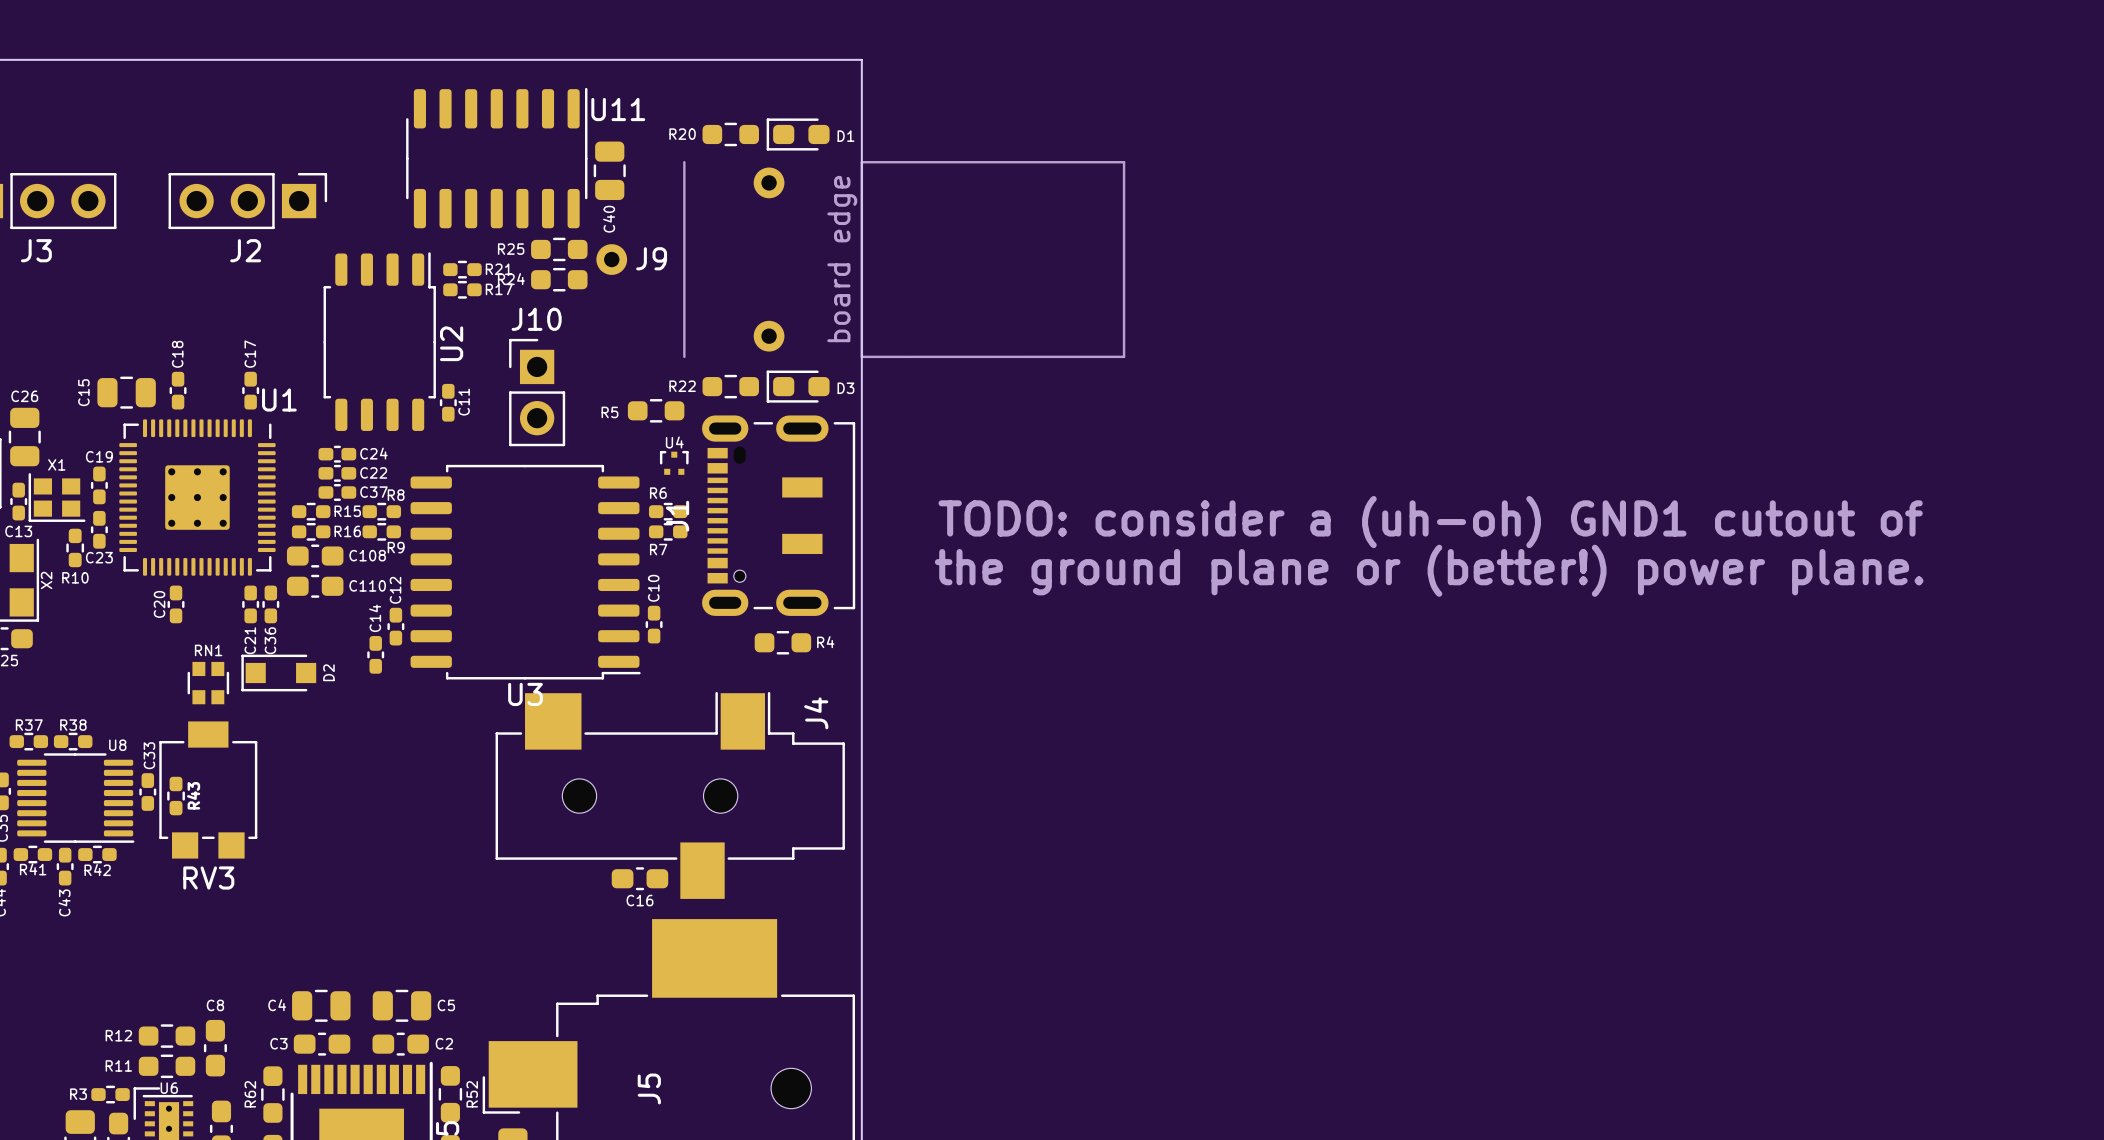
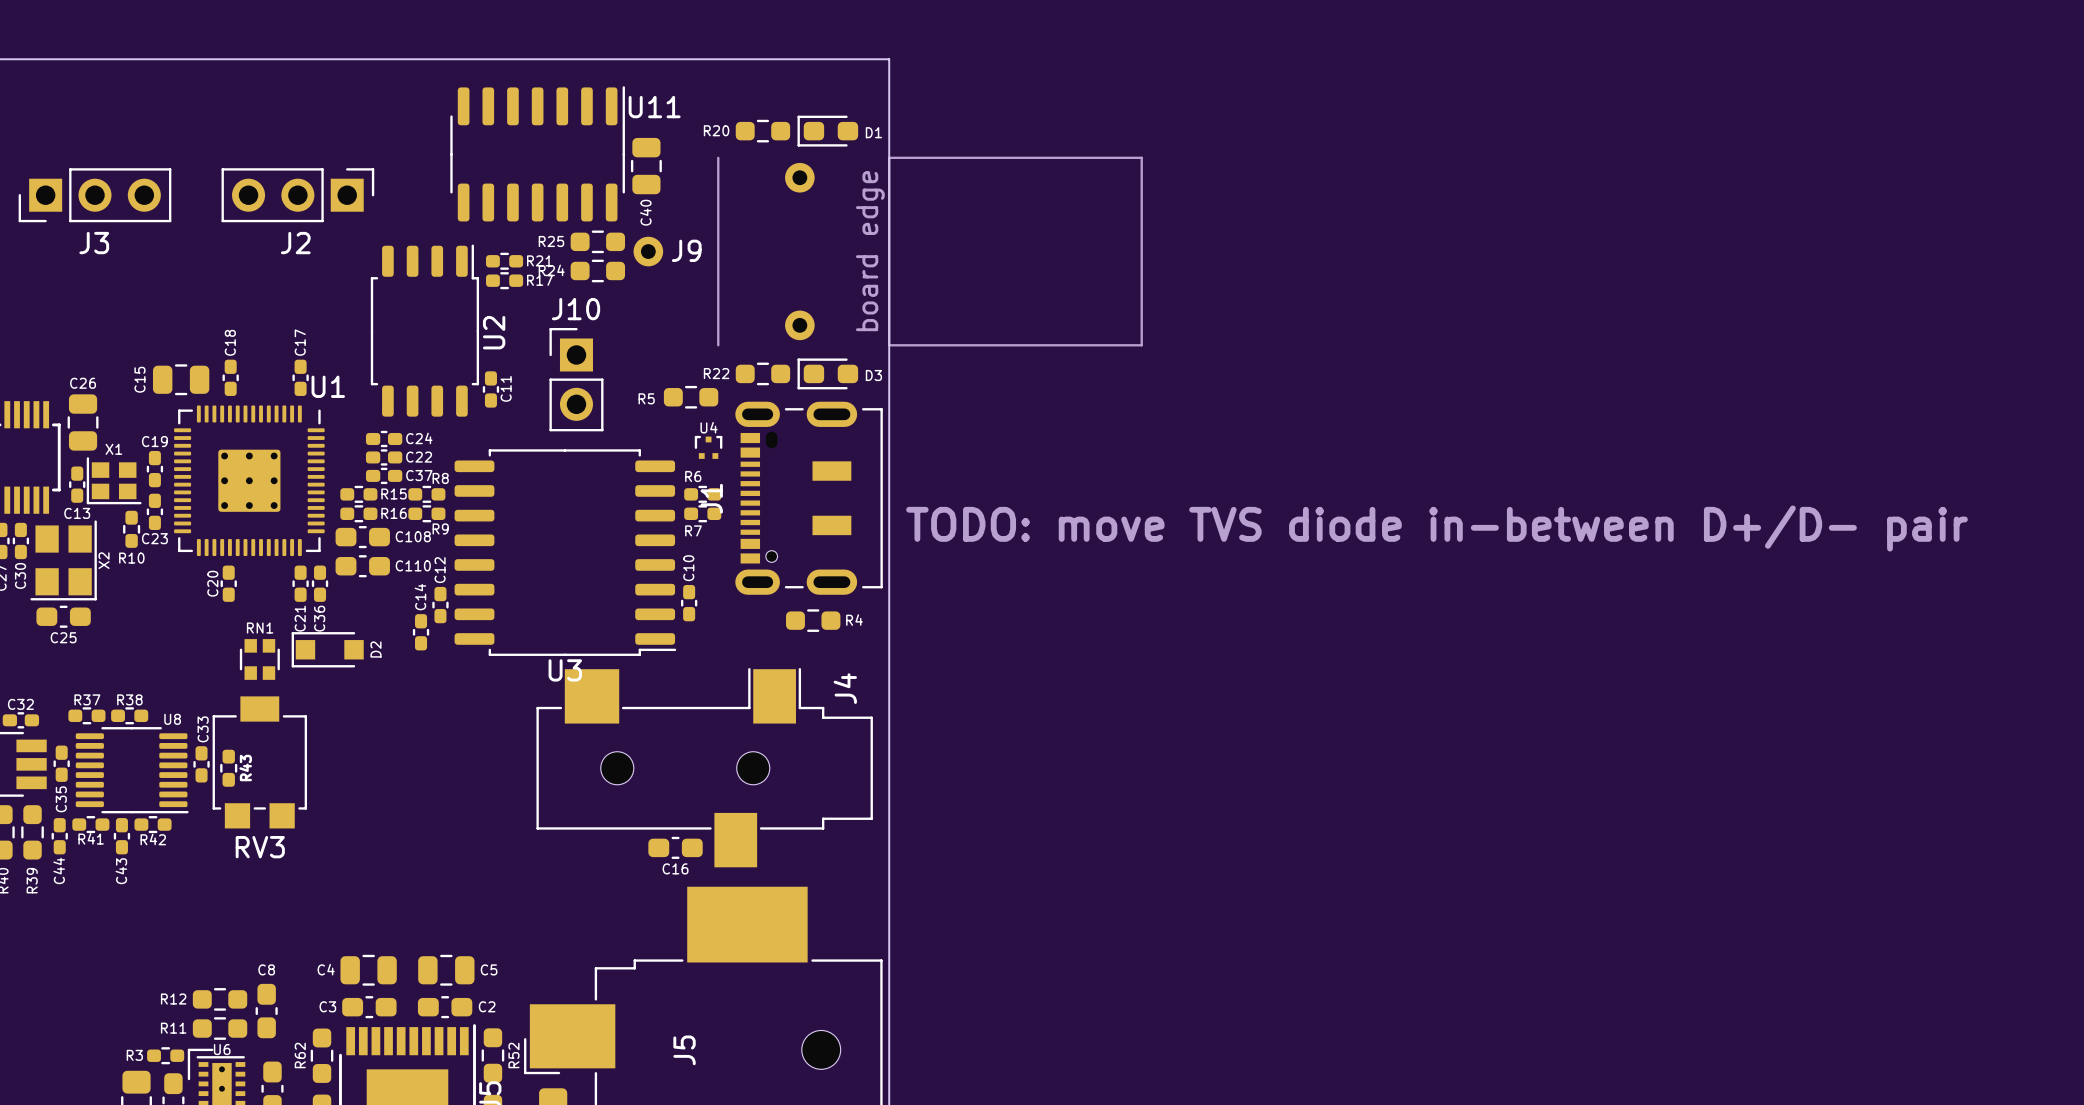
text: TODO: consider a (uh-oh) GND1 cutout of (1430, 522) -> none
text: none -> TODO: move TVS diode in-between D+/D- pair (1436, 528)
text: the ground plane or (better!) power plane. (1429, 570) -> none

